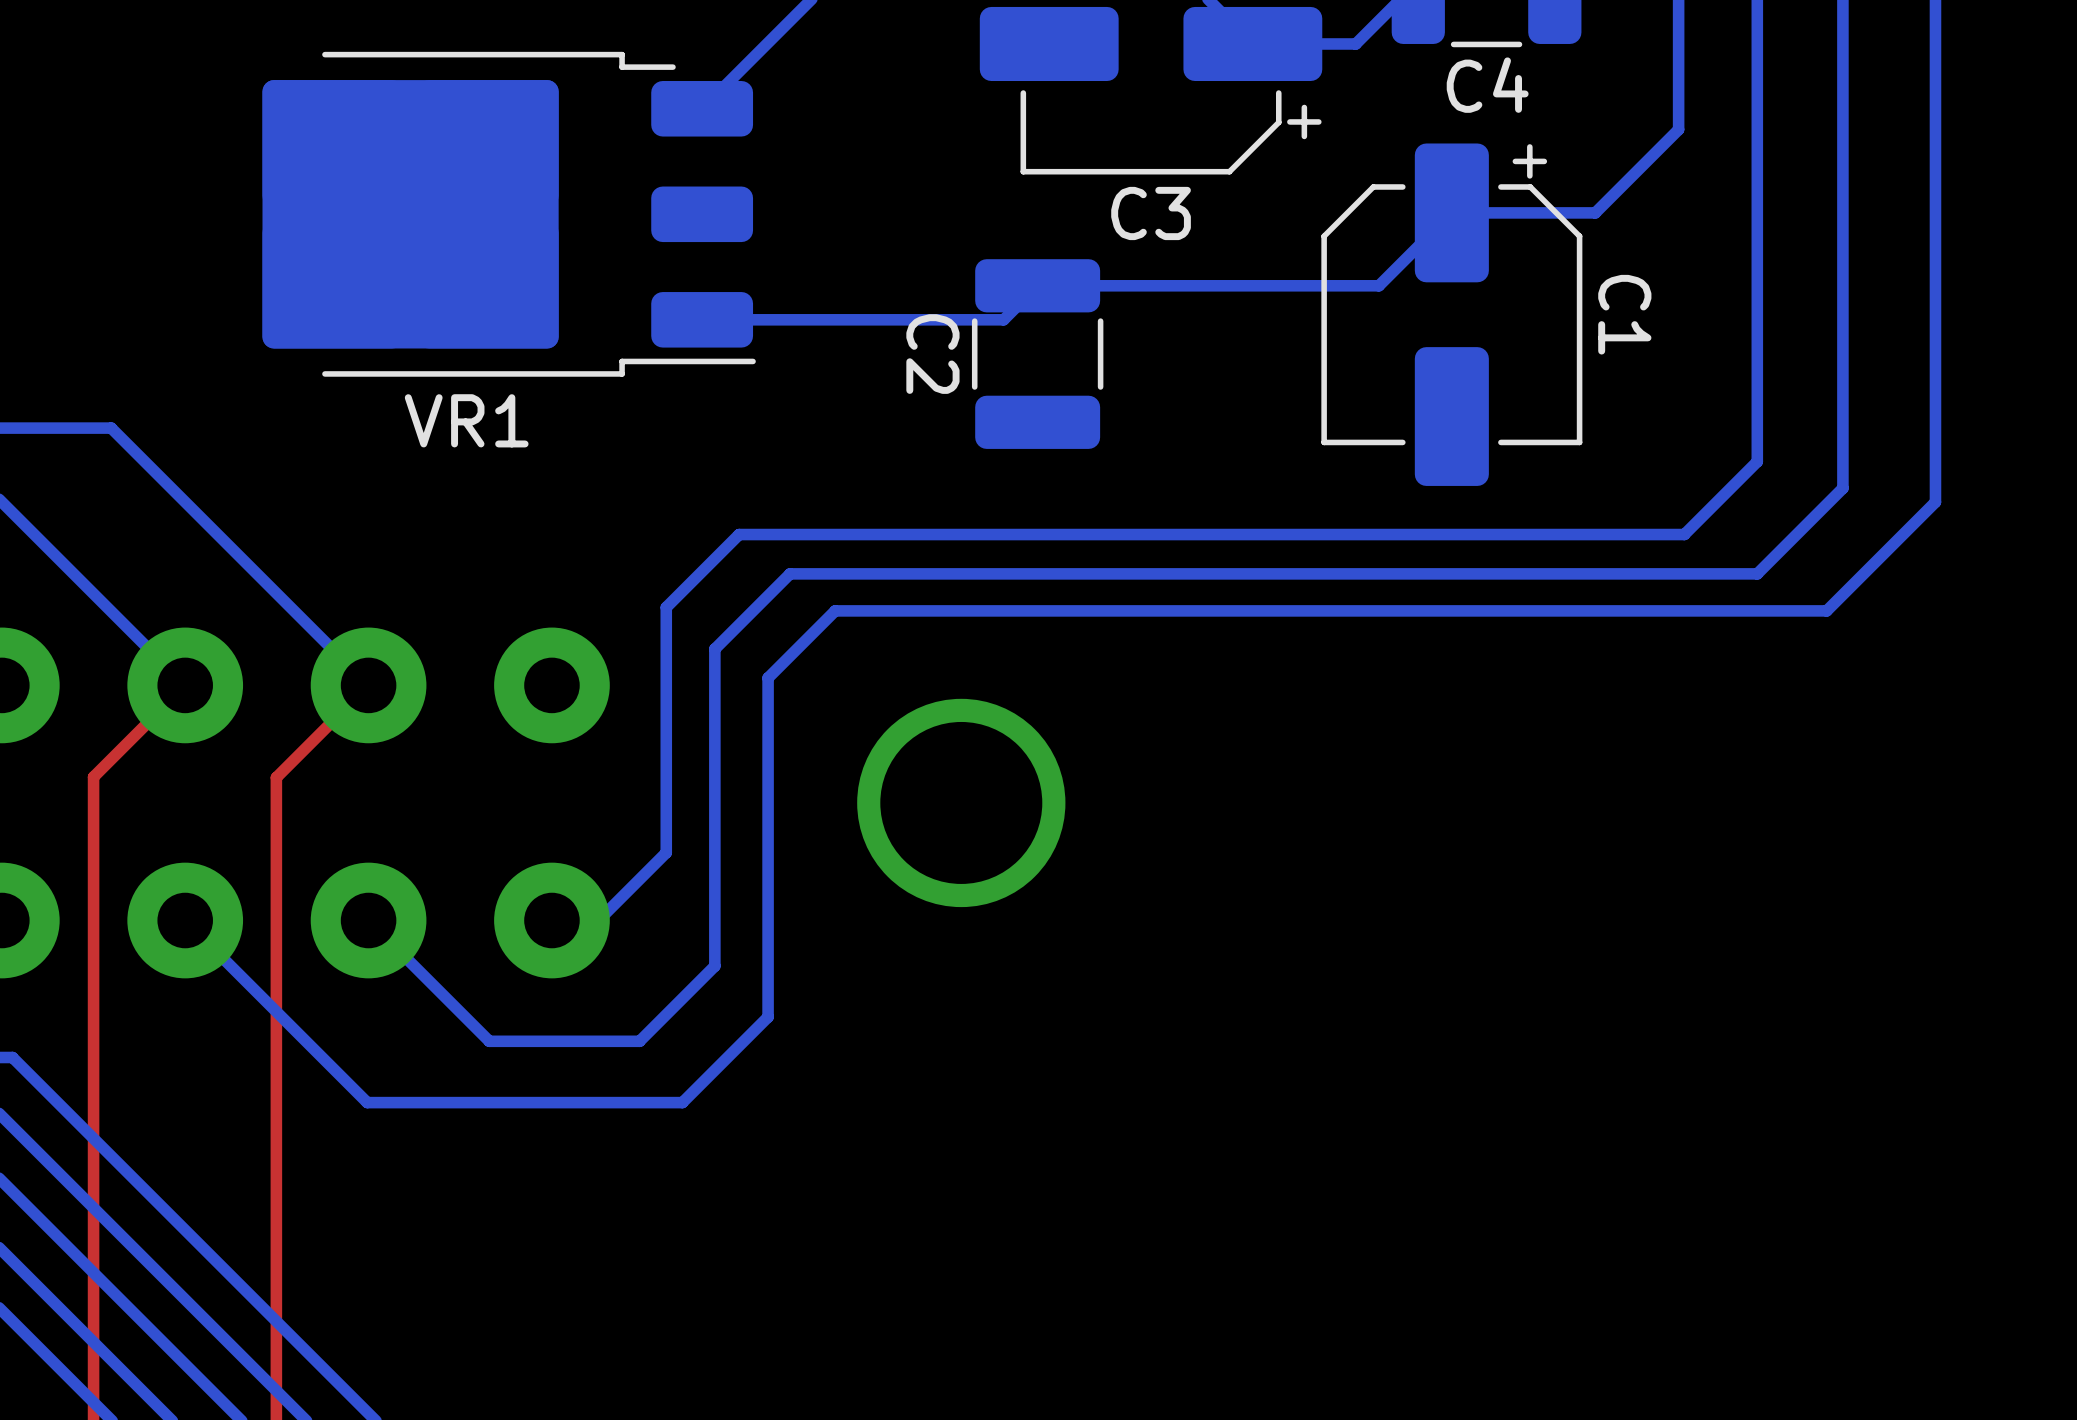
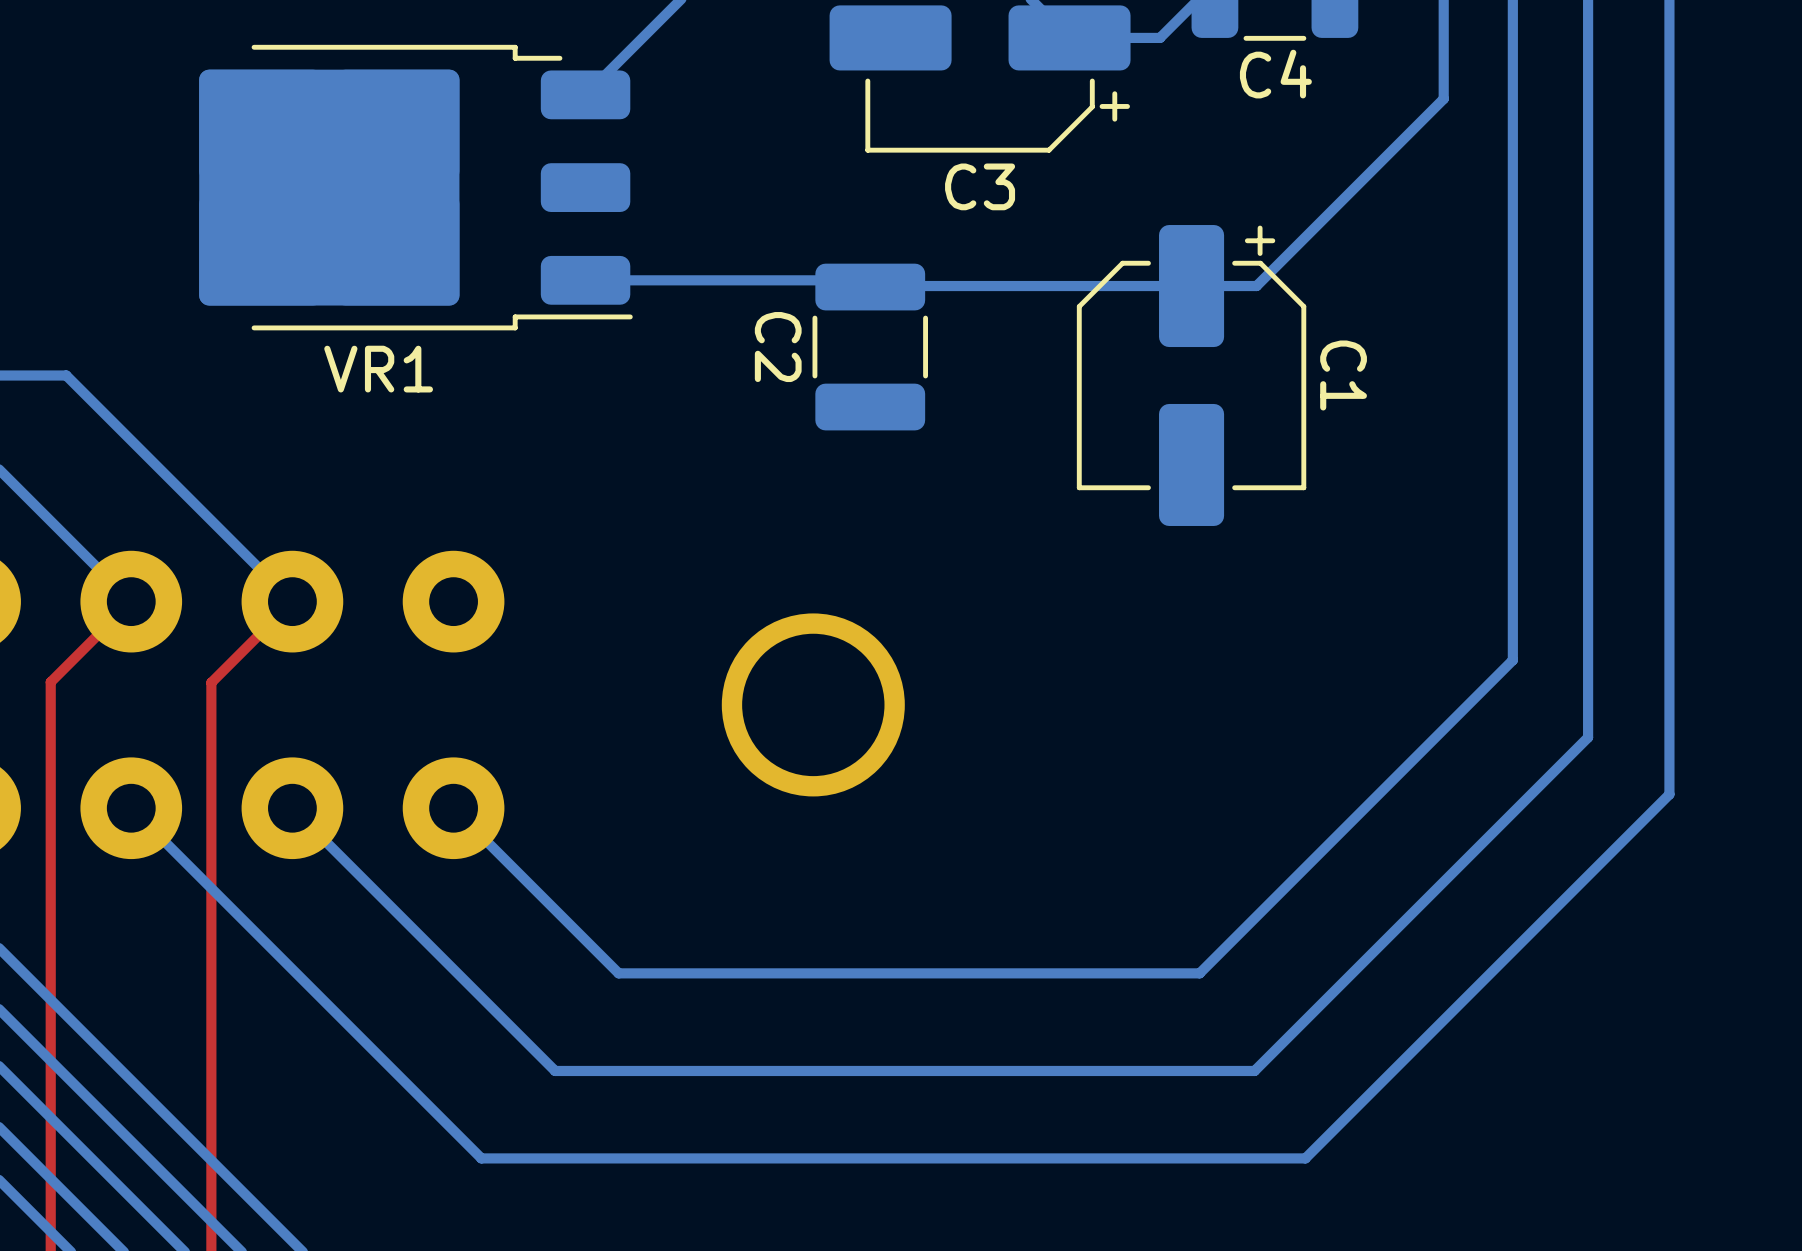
bottom track: (1678, 113) (1678, 129) (1595, 212) (1451, 212) (1378, 285) (1037, 285) (1003, 319) -> (1443, 98) (1256, 286) (870, 287) (863, 280) (850, 280)
C1 position: (1451, 314) -> (1191, 375)
C2 position: (1037, 354) -> (870, 347)
bottom track: (1757, 461) (1684, 534) (739, 534) (666, 607) (666, 852) (598, 920) (551, 920) -> (1512, 404) (1512, 660) (1199, 973) (618, 973) (453, 808)
bottom track: (1842, 488) (1757, 573) (790, 573) (714, 649) (714, 966) (639, 1041) (489, 1041) -> (1588, 428) (1588, 737) (1254, 1070) (555, 1070) (398, 914)
bottom track: (1935, 502) (1826, 610) (835, 610) (768, 678) (768, 1017) (682, 1102) (367, 1102) -> (1669, 440) (1669, 794) (1305, 1158) (481, 1158) (291, 968)

